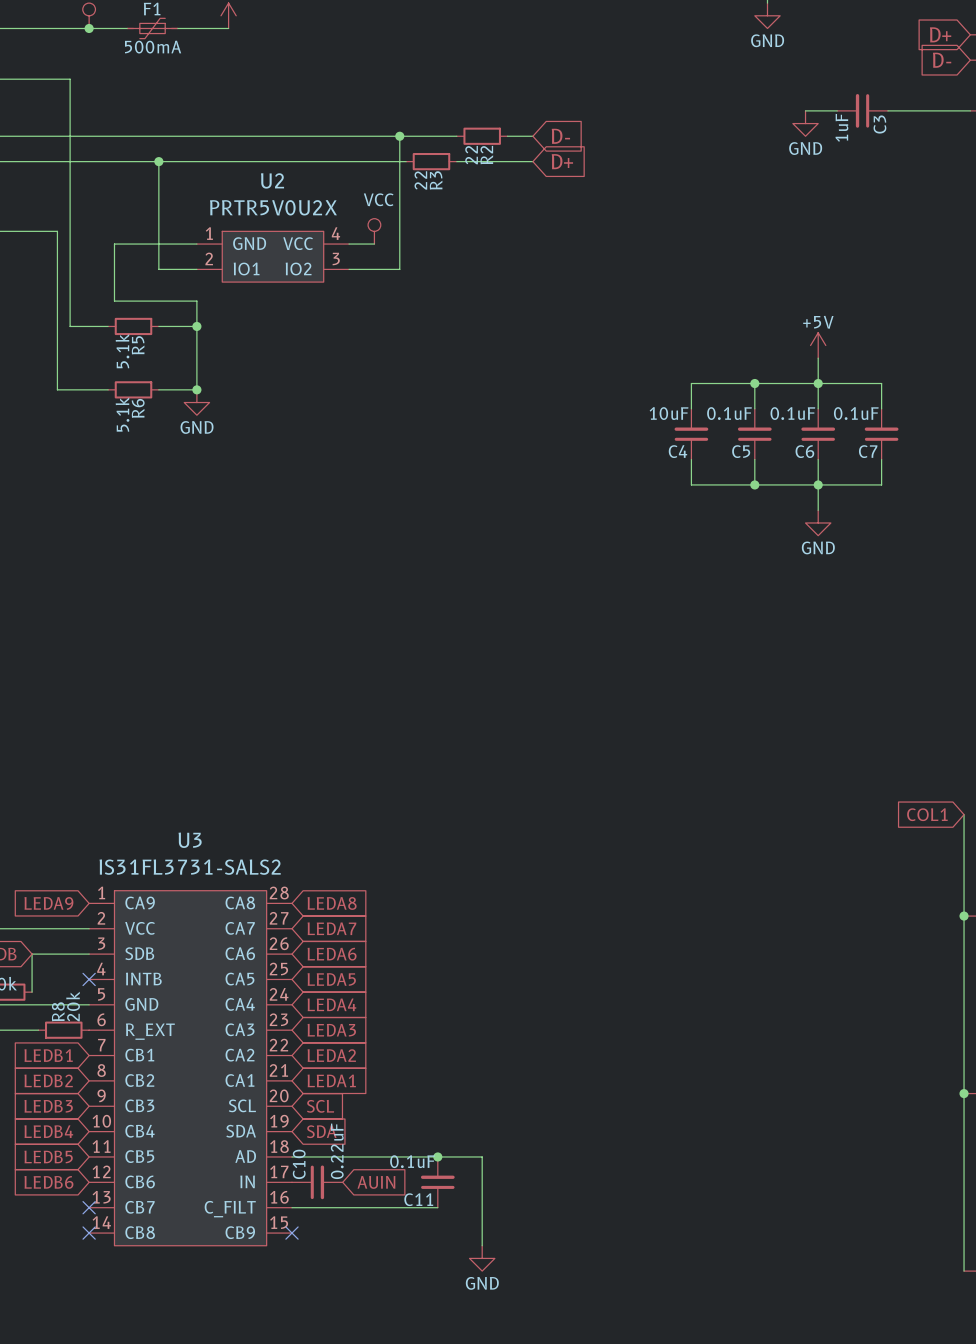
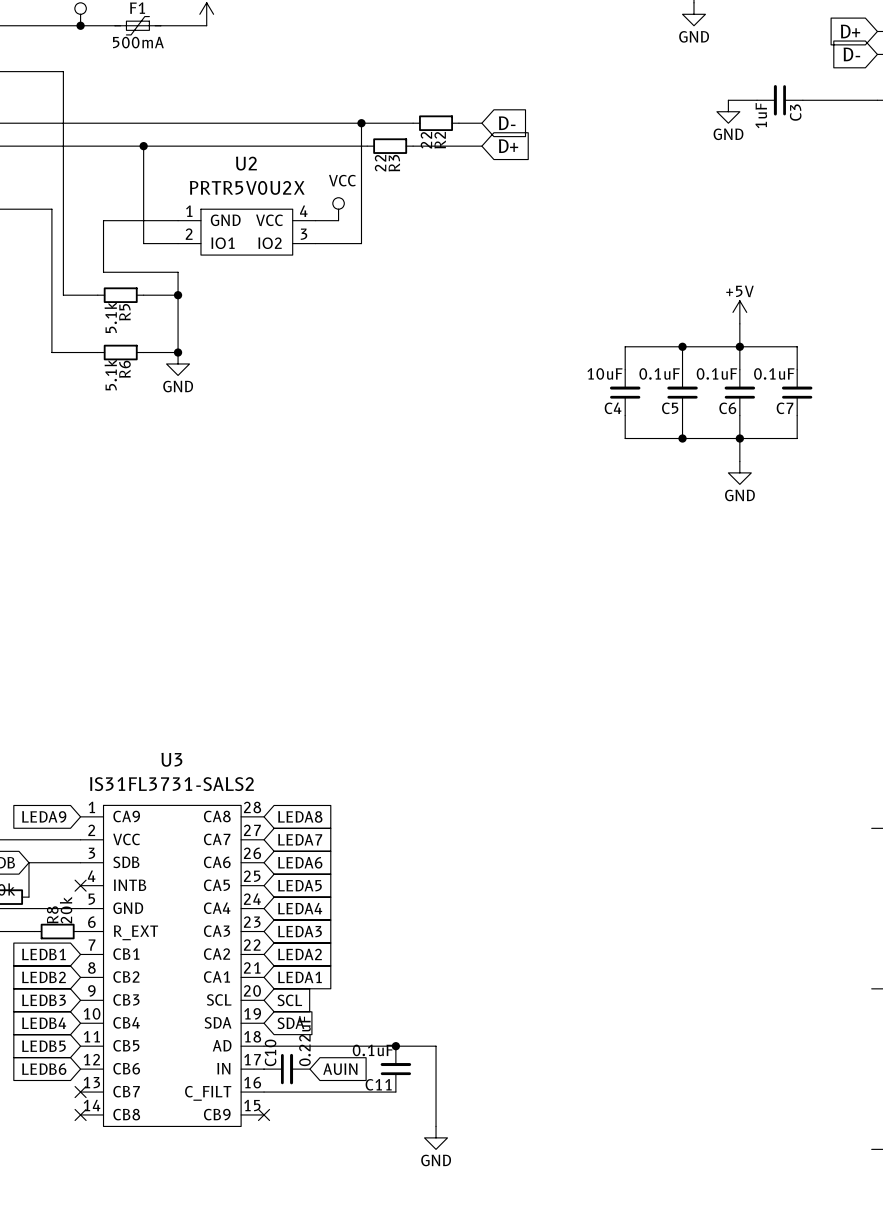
global label: COL1 (927, 814) -> none
wire: (964, 814) (964, 1271) -> none
junction: (964, 916) -> none
junction: (964, 1093) -> none

